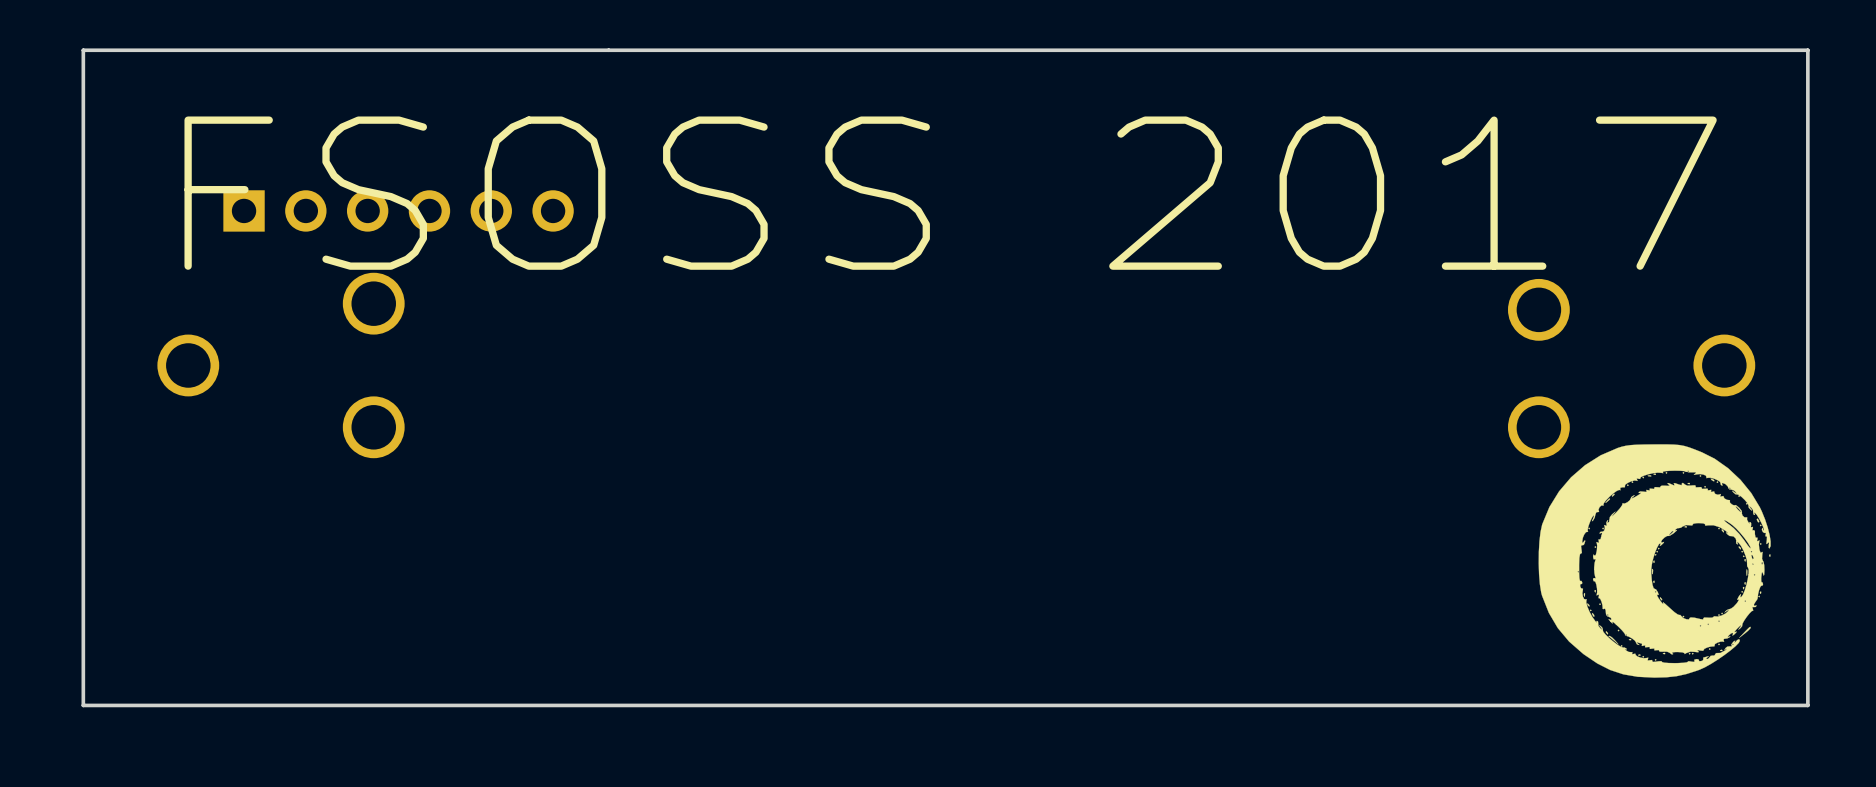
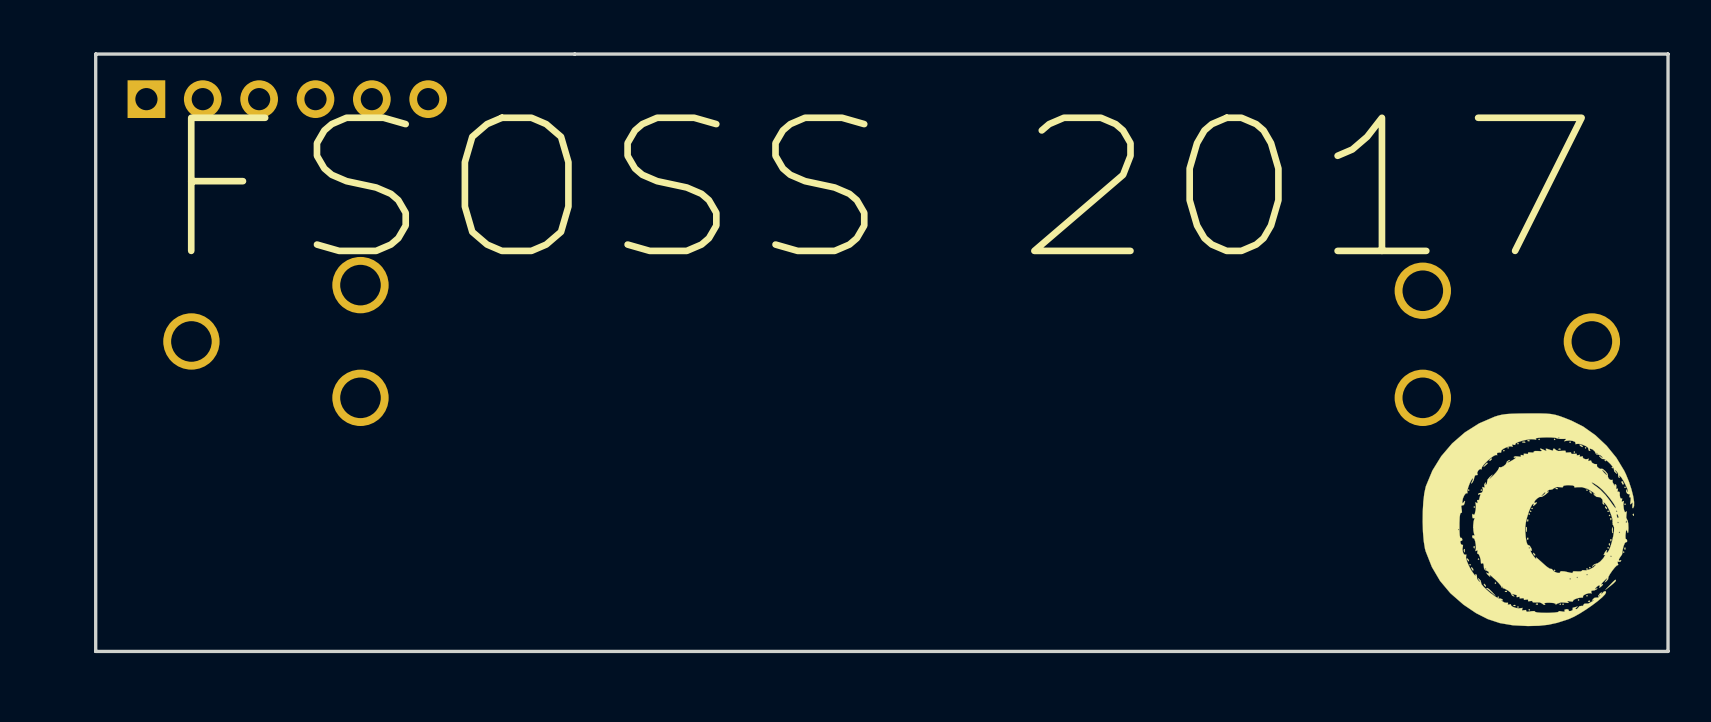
part position: (398, 210) -> (287, 99)

